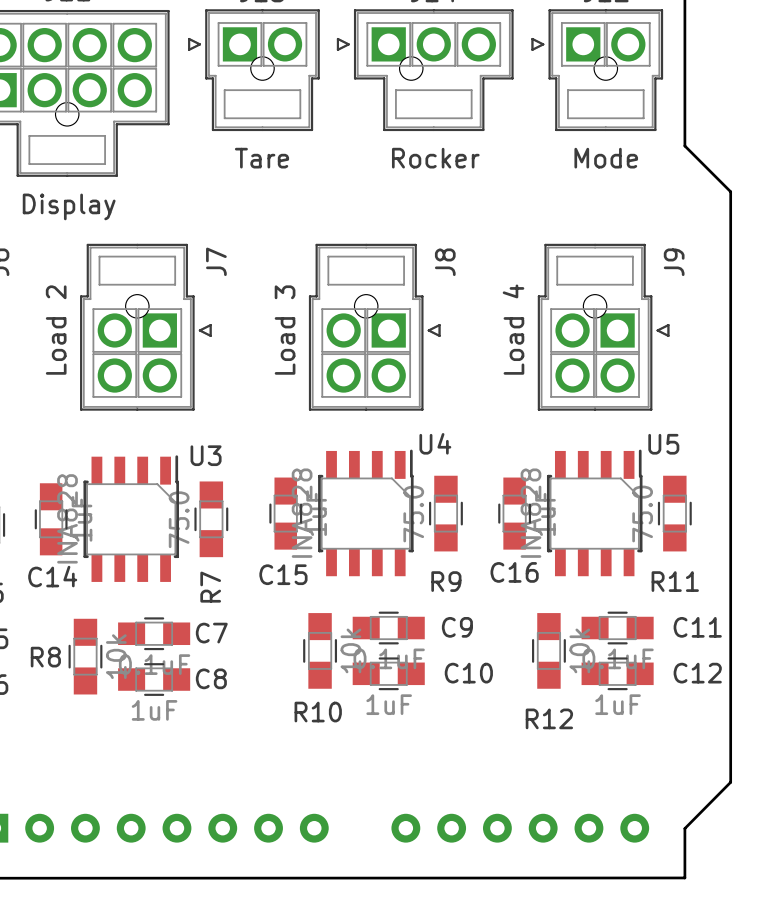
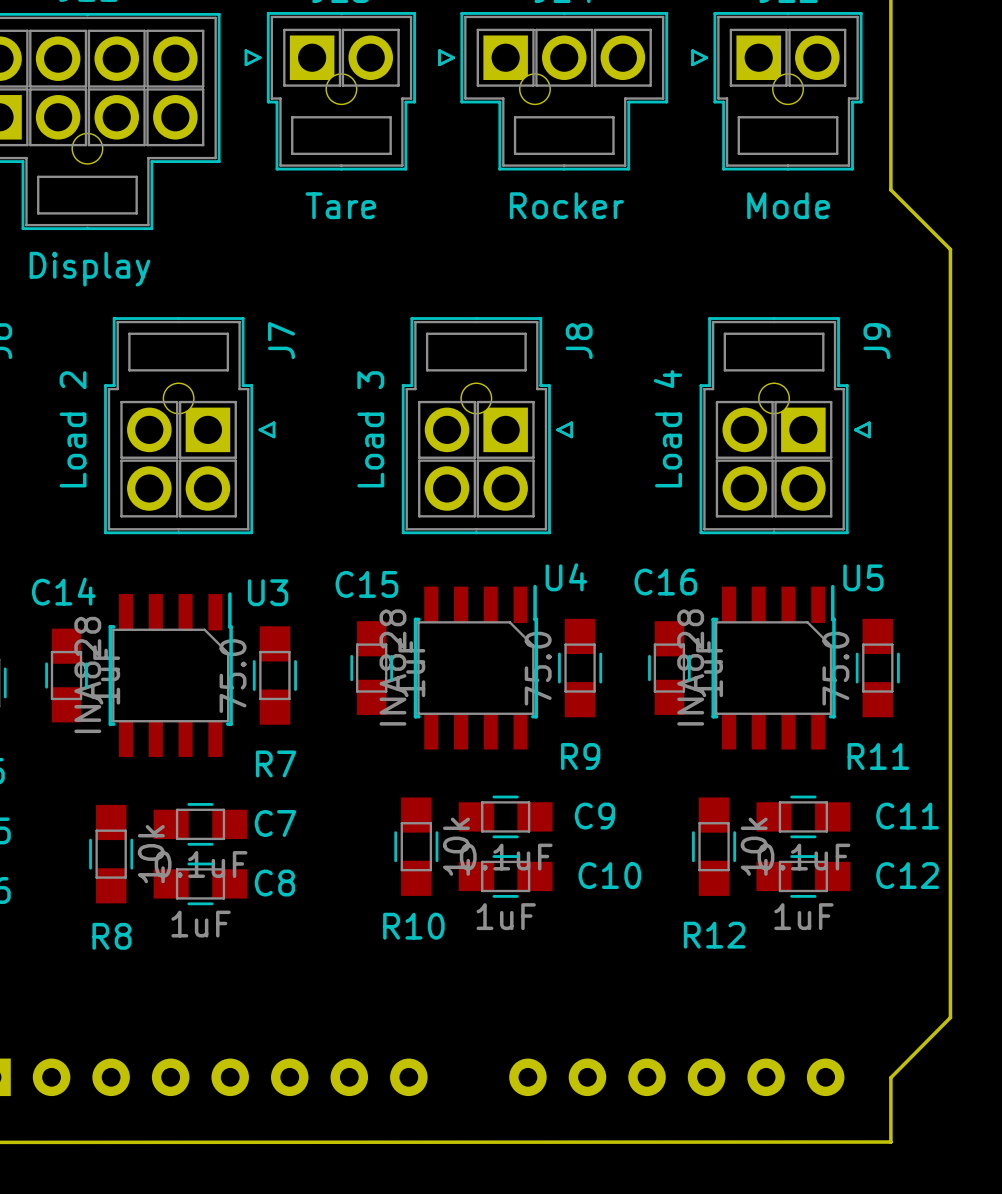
C16 name position: C16 (514, 572) -> C16 (665, 582)
C15 name position: C15 (283, 574) -> C15 (366, 584)
C14 name position: C14 (52, 576) -> C14 (63, 591)
R7 name rotation: 0° (210, 587) -> 90° clockwise (276, 763)
R8 name position: R8 (45, 657) -> R8 (112, 936)

